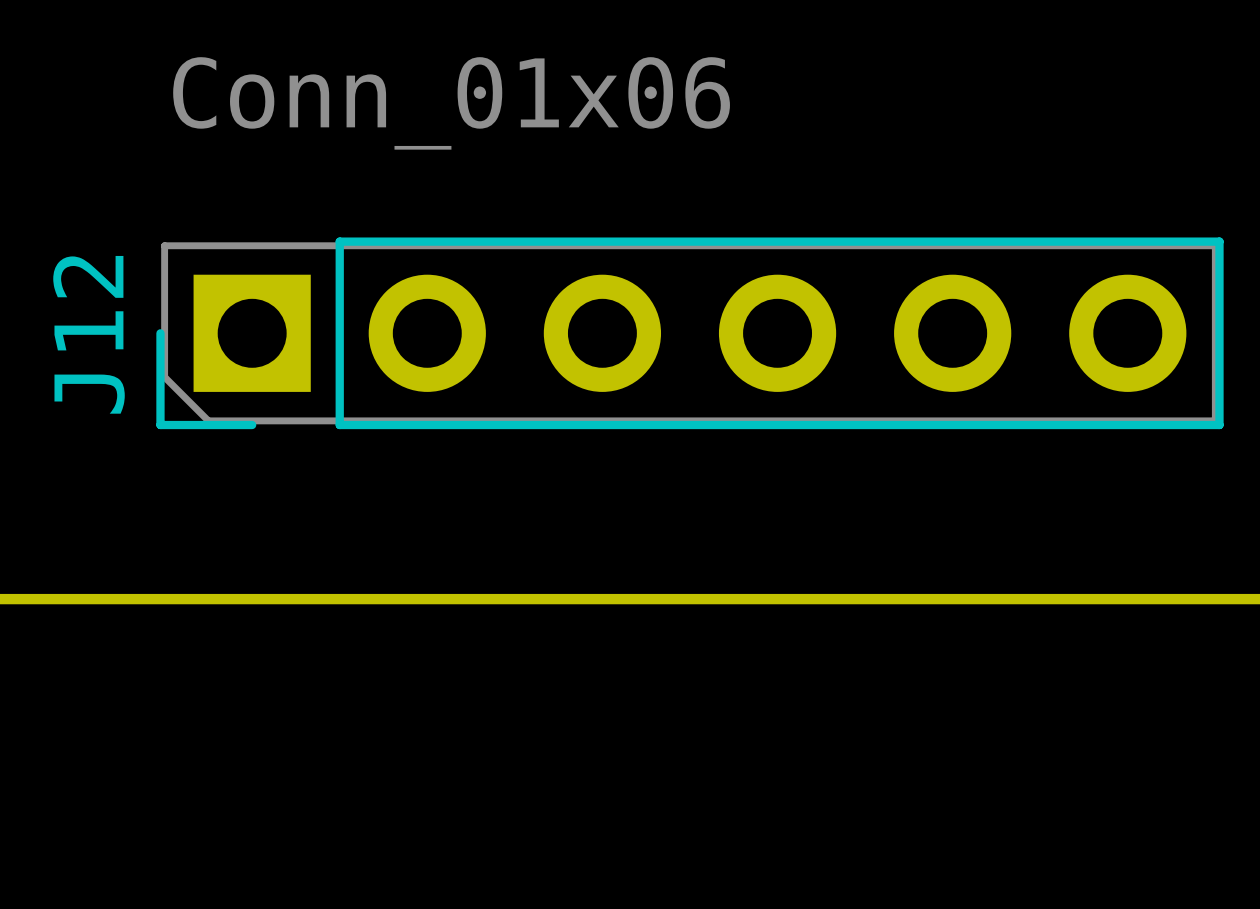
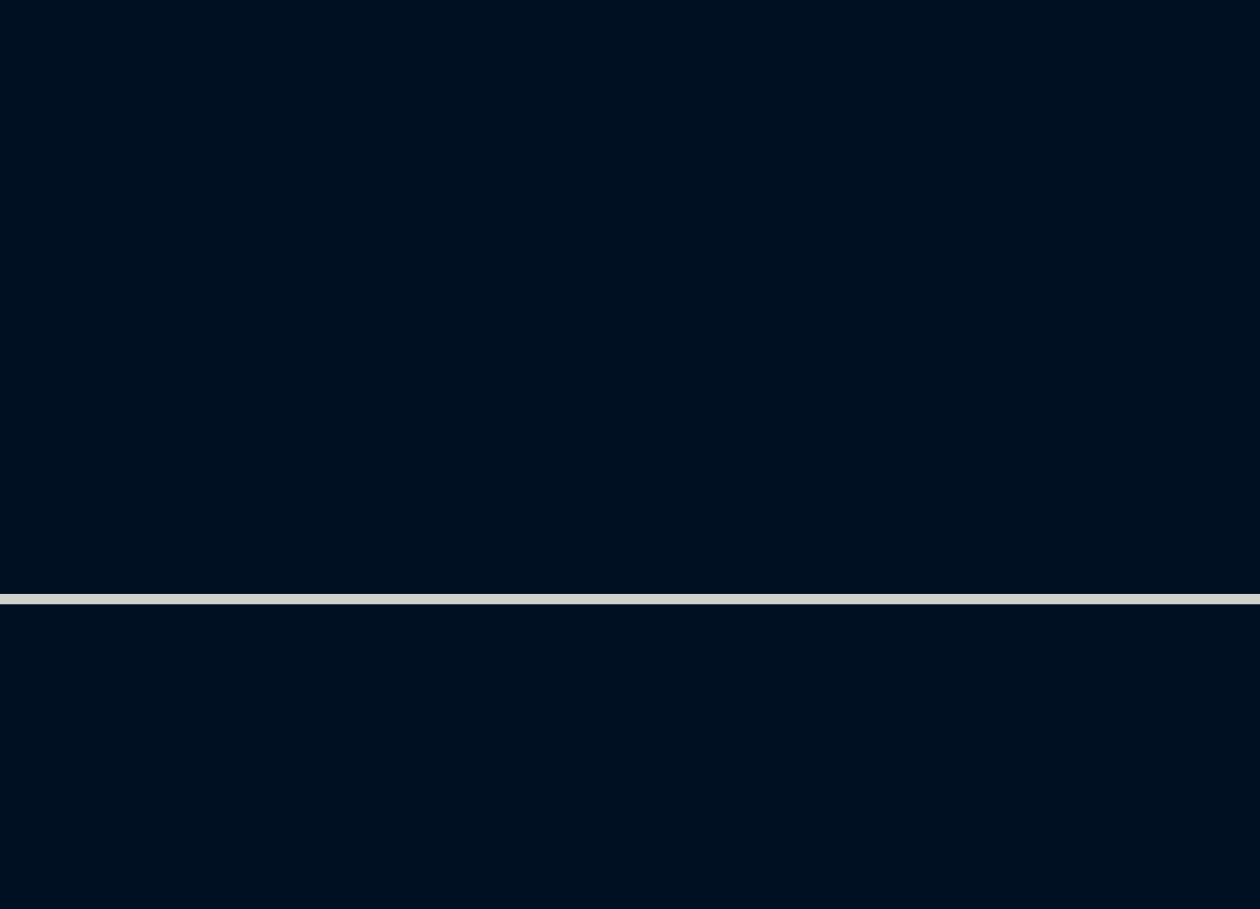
J12: Conn_01x06 (689, 333) -> none

